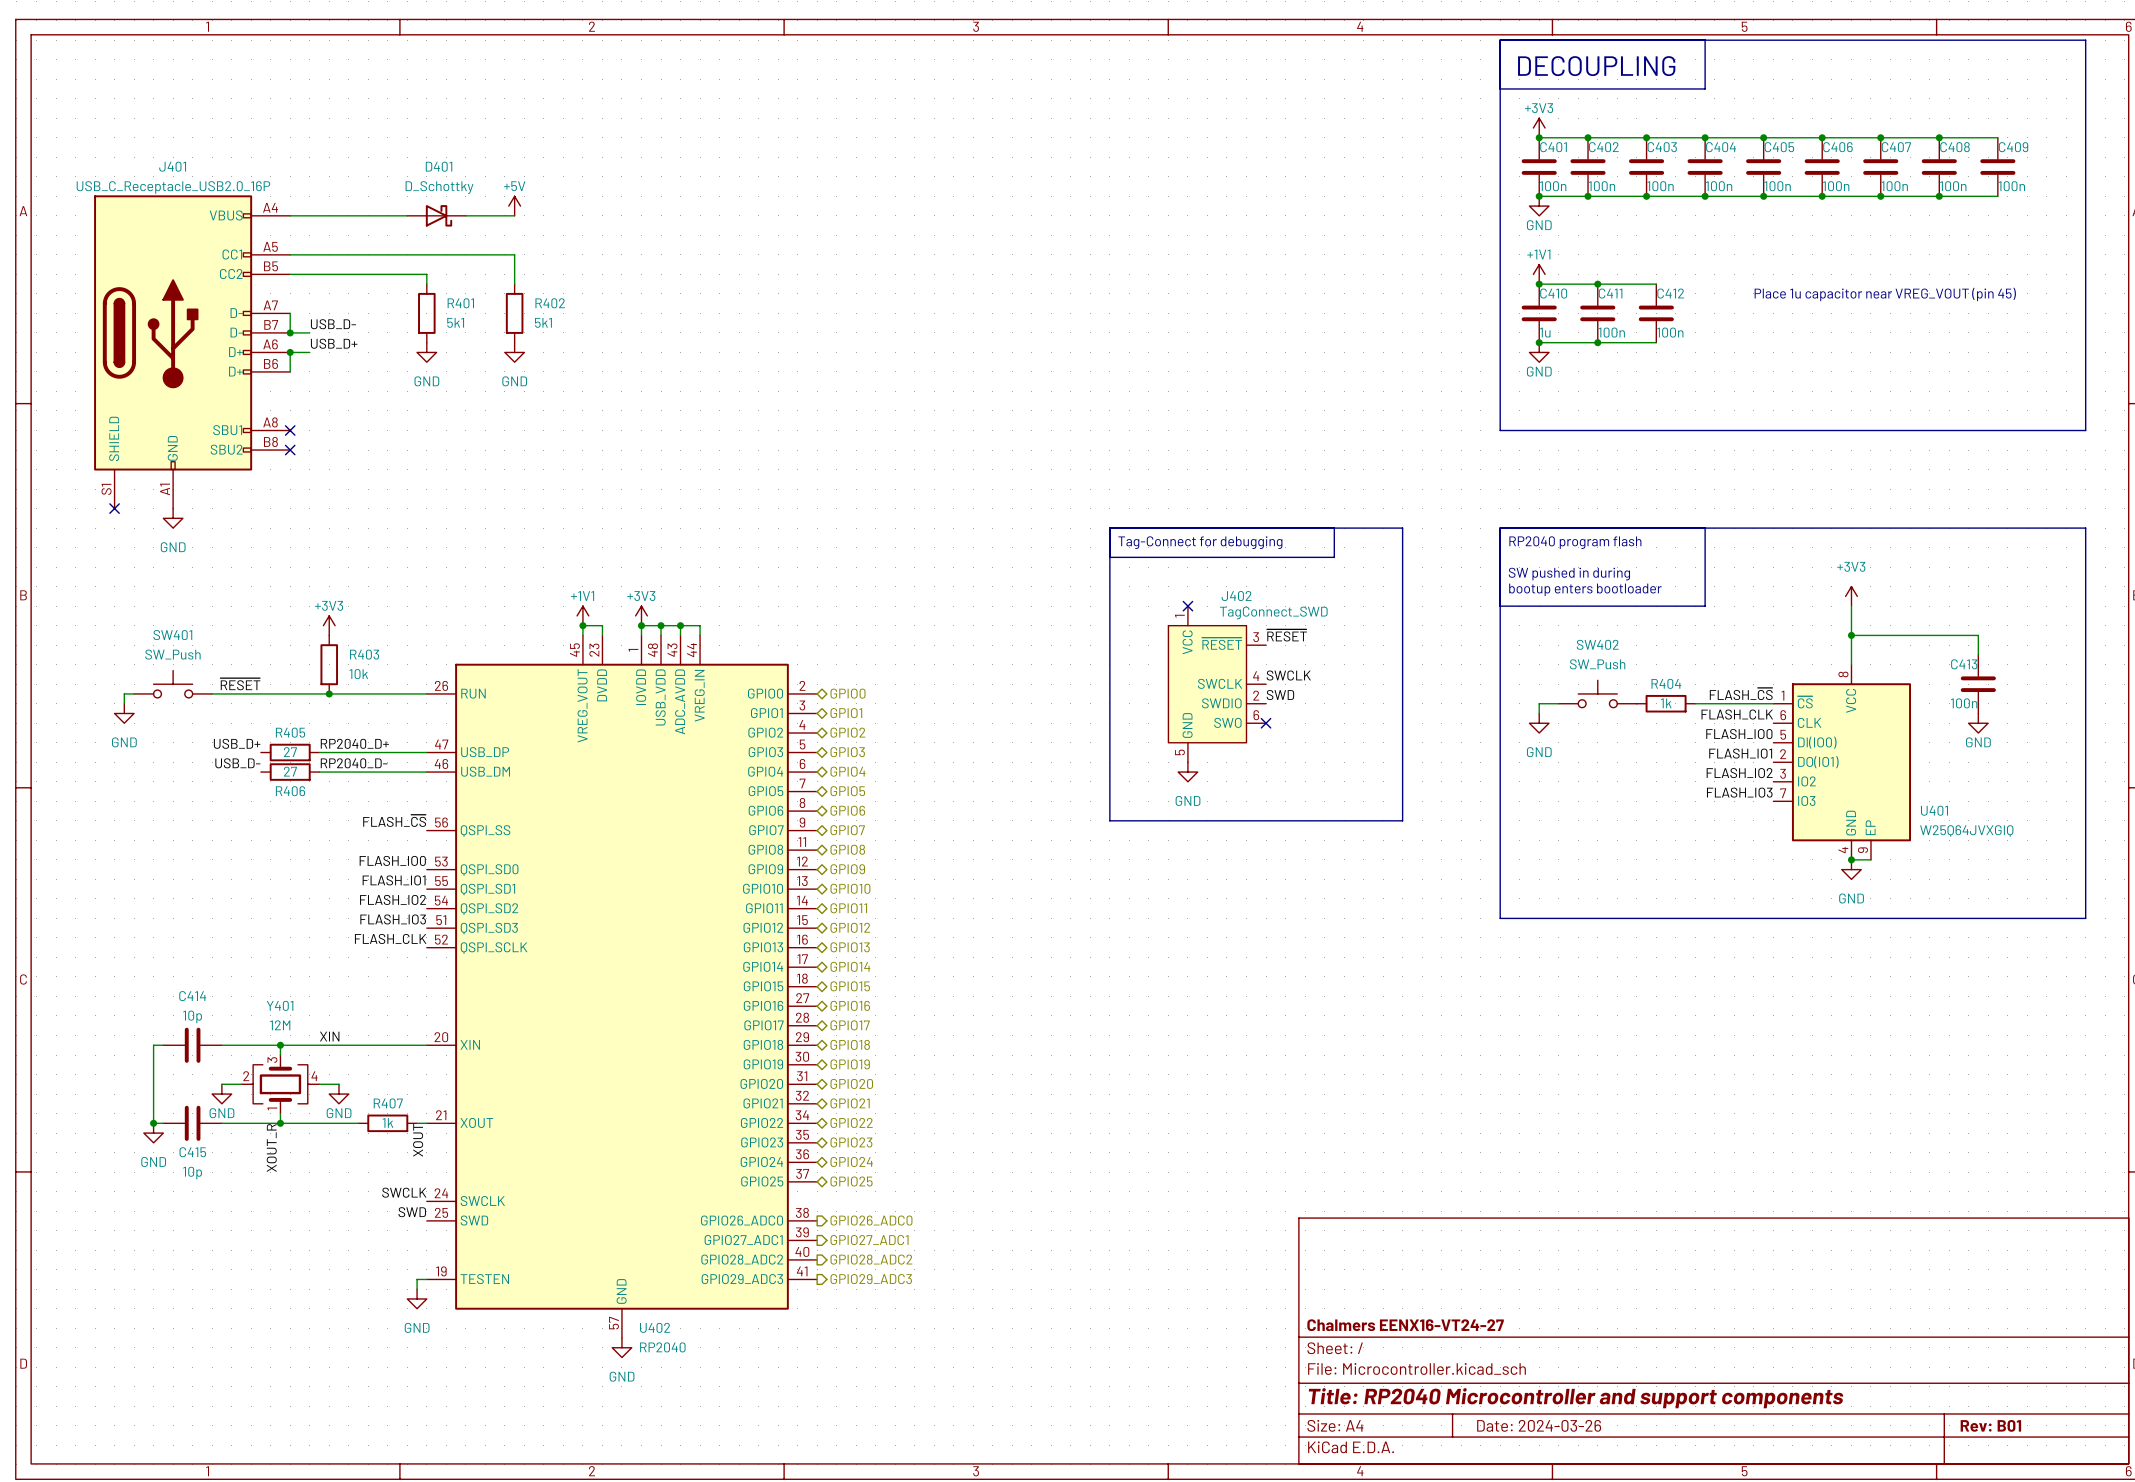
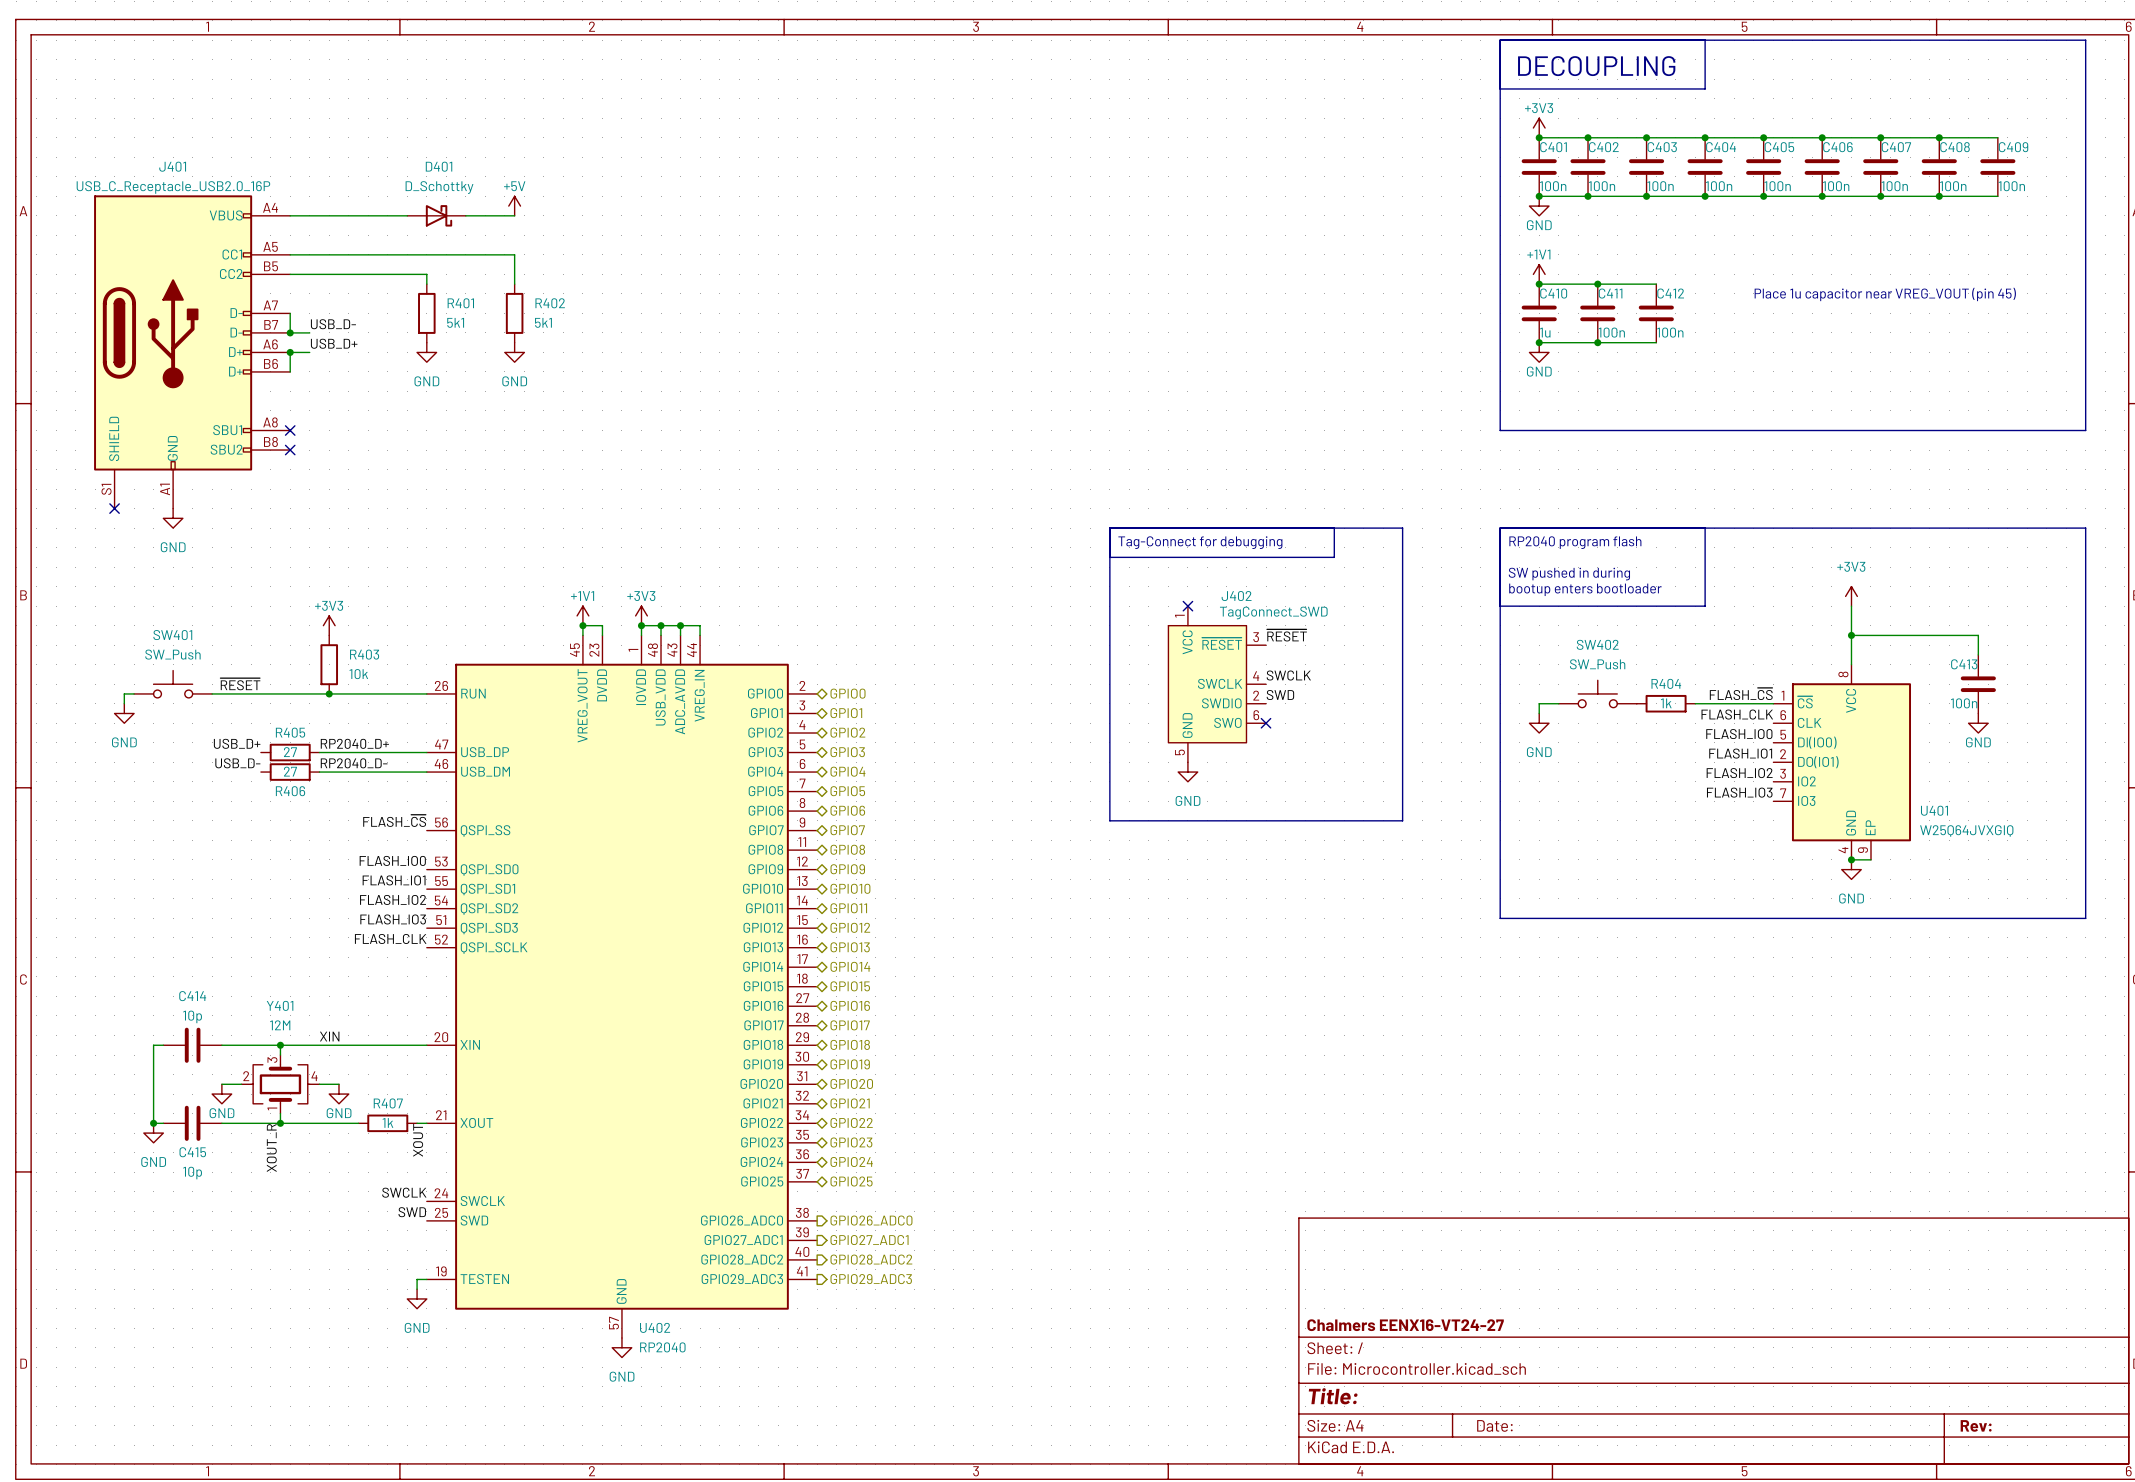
title block: Title: RP2040 Microcontroller and support components (1576, 1398) -> Title: (1333, 1396)
title block: Date: 2024-03-26 (1539, 1425) -> Date: (1494, 1425)
title block: Rev: B01 (1990, 1425) -> Rev: (1976, 1425)

